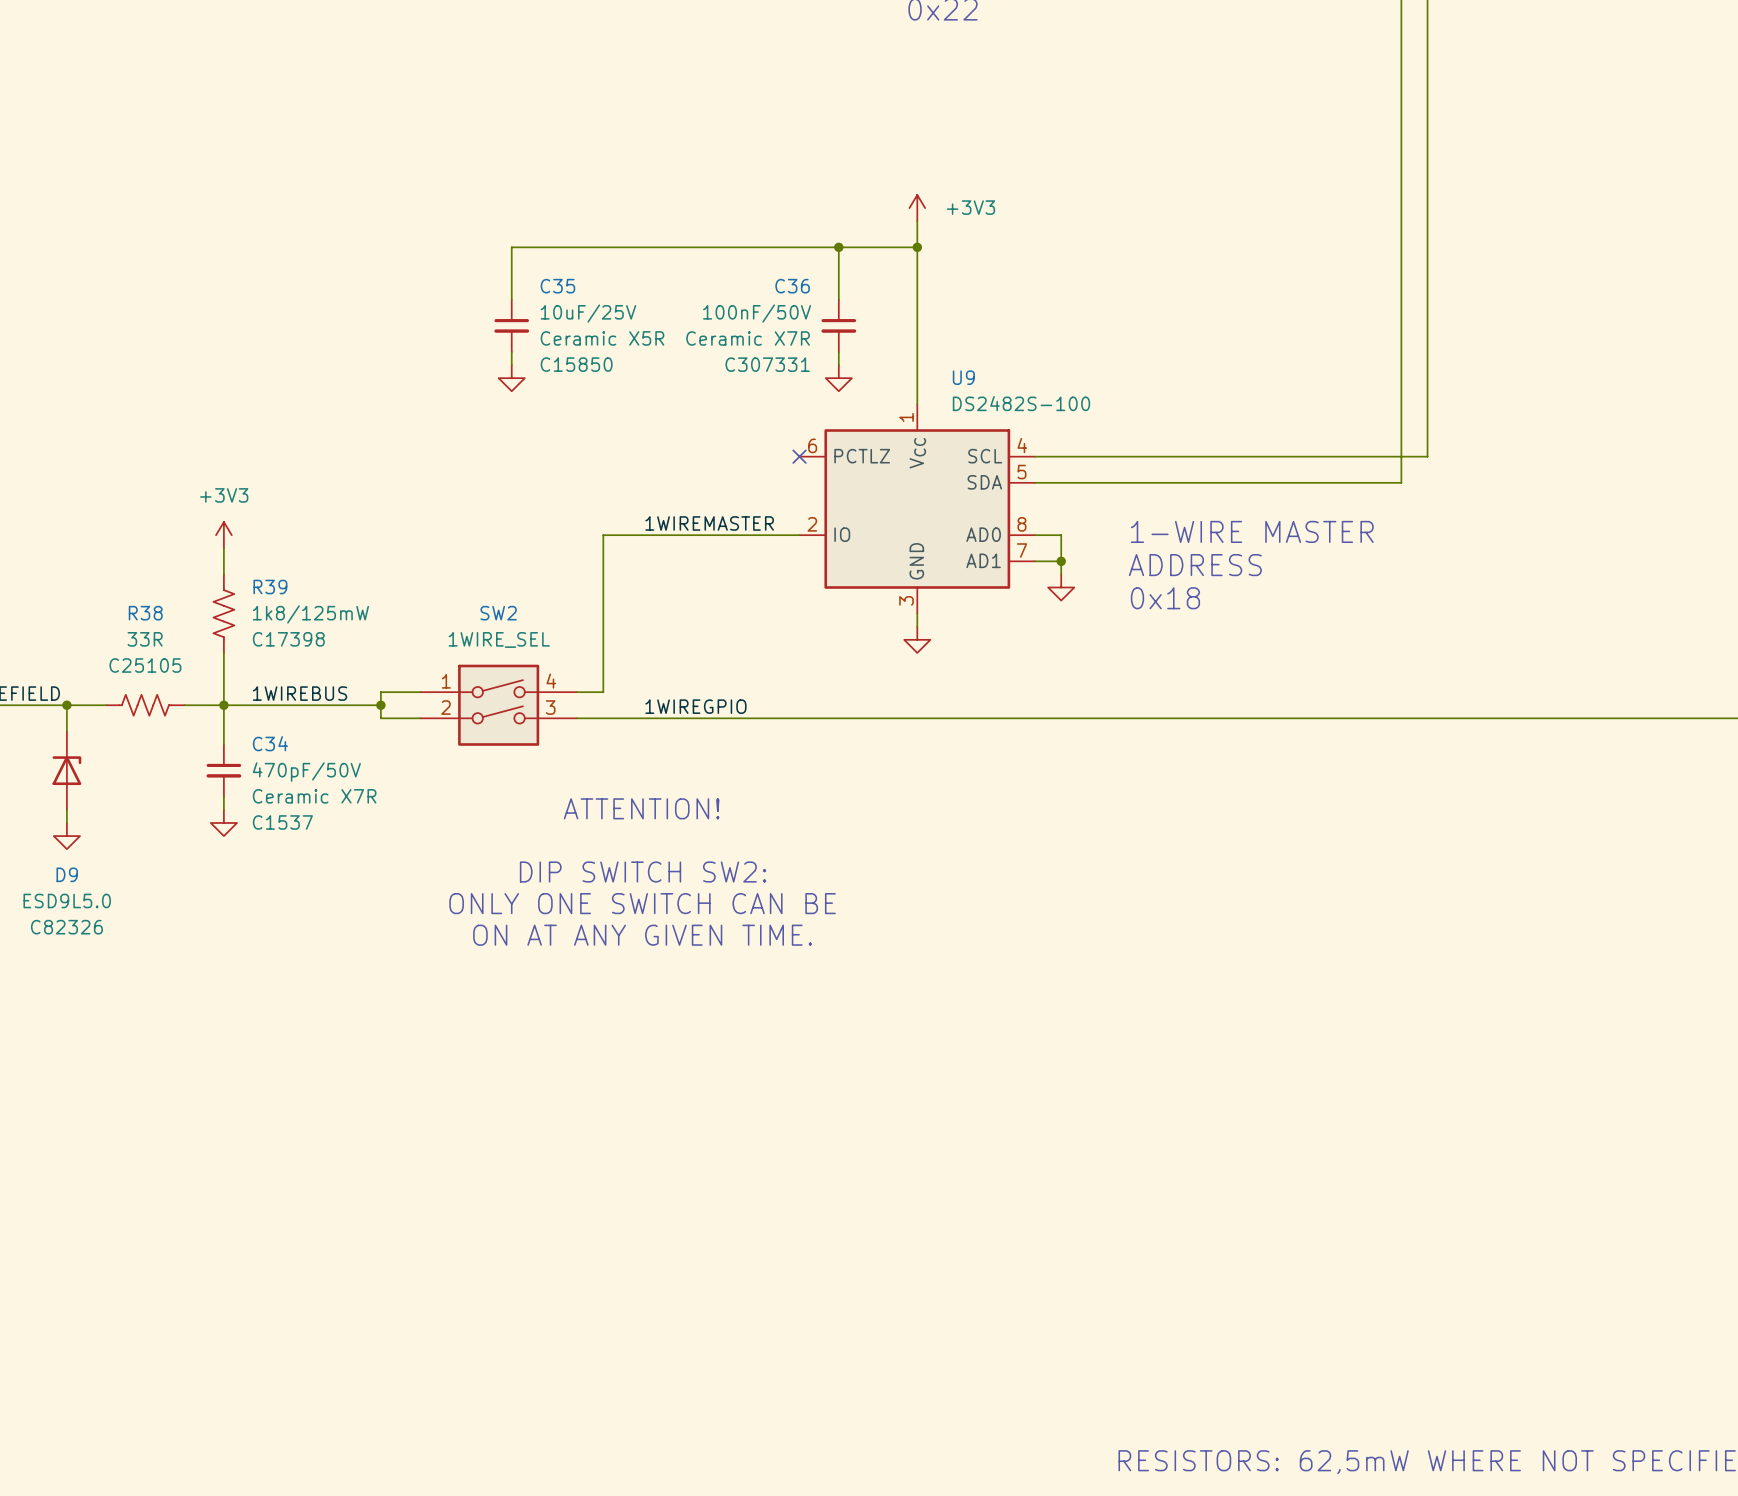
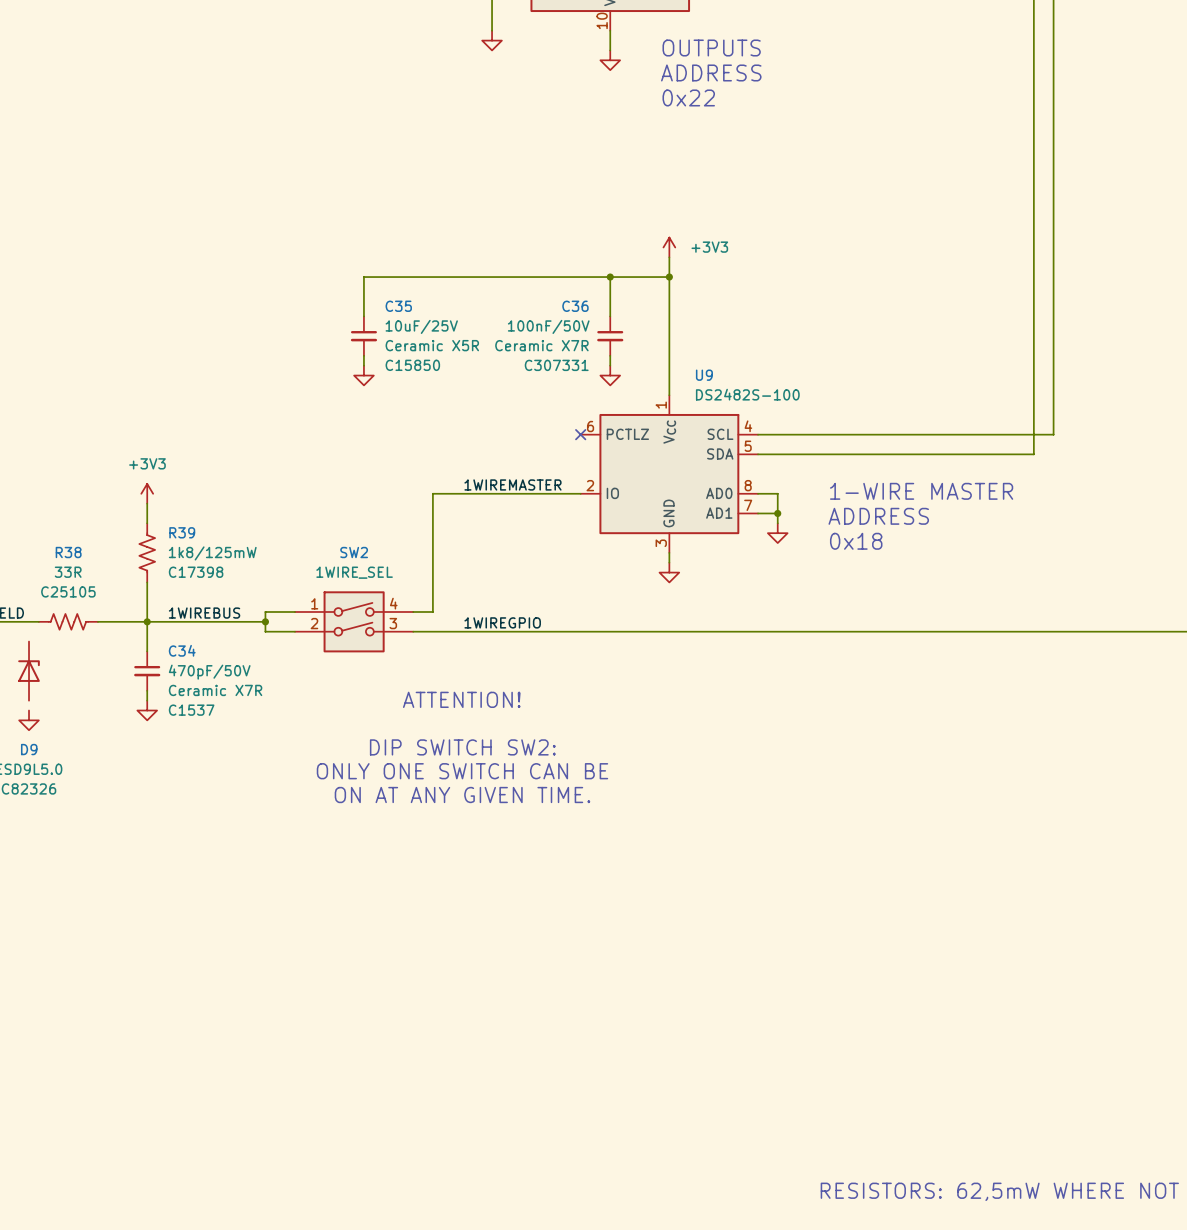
wire: (66, 705) (66, 731) -> none
junction: (66, 705) -> none
R38 position: (145, 705) -> (68, 621)
wire: (66, 809) (66, 822) -> none

